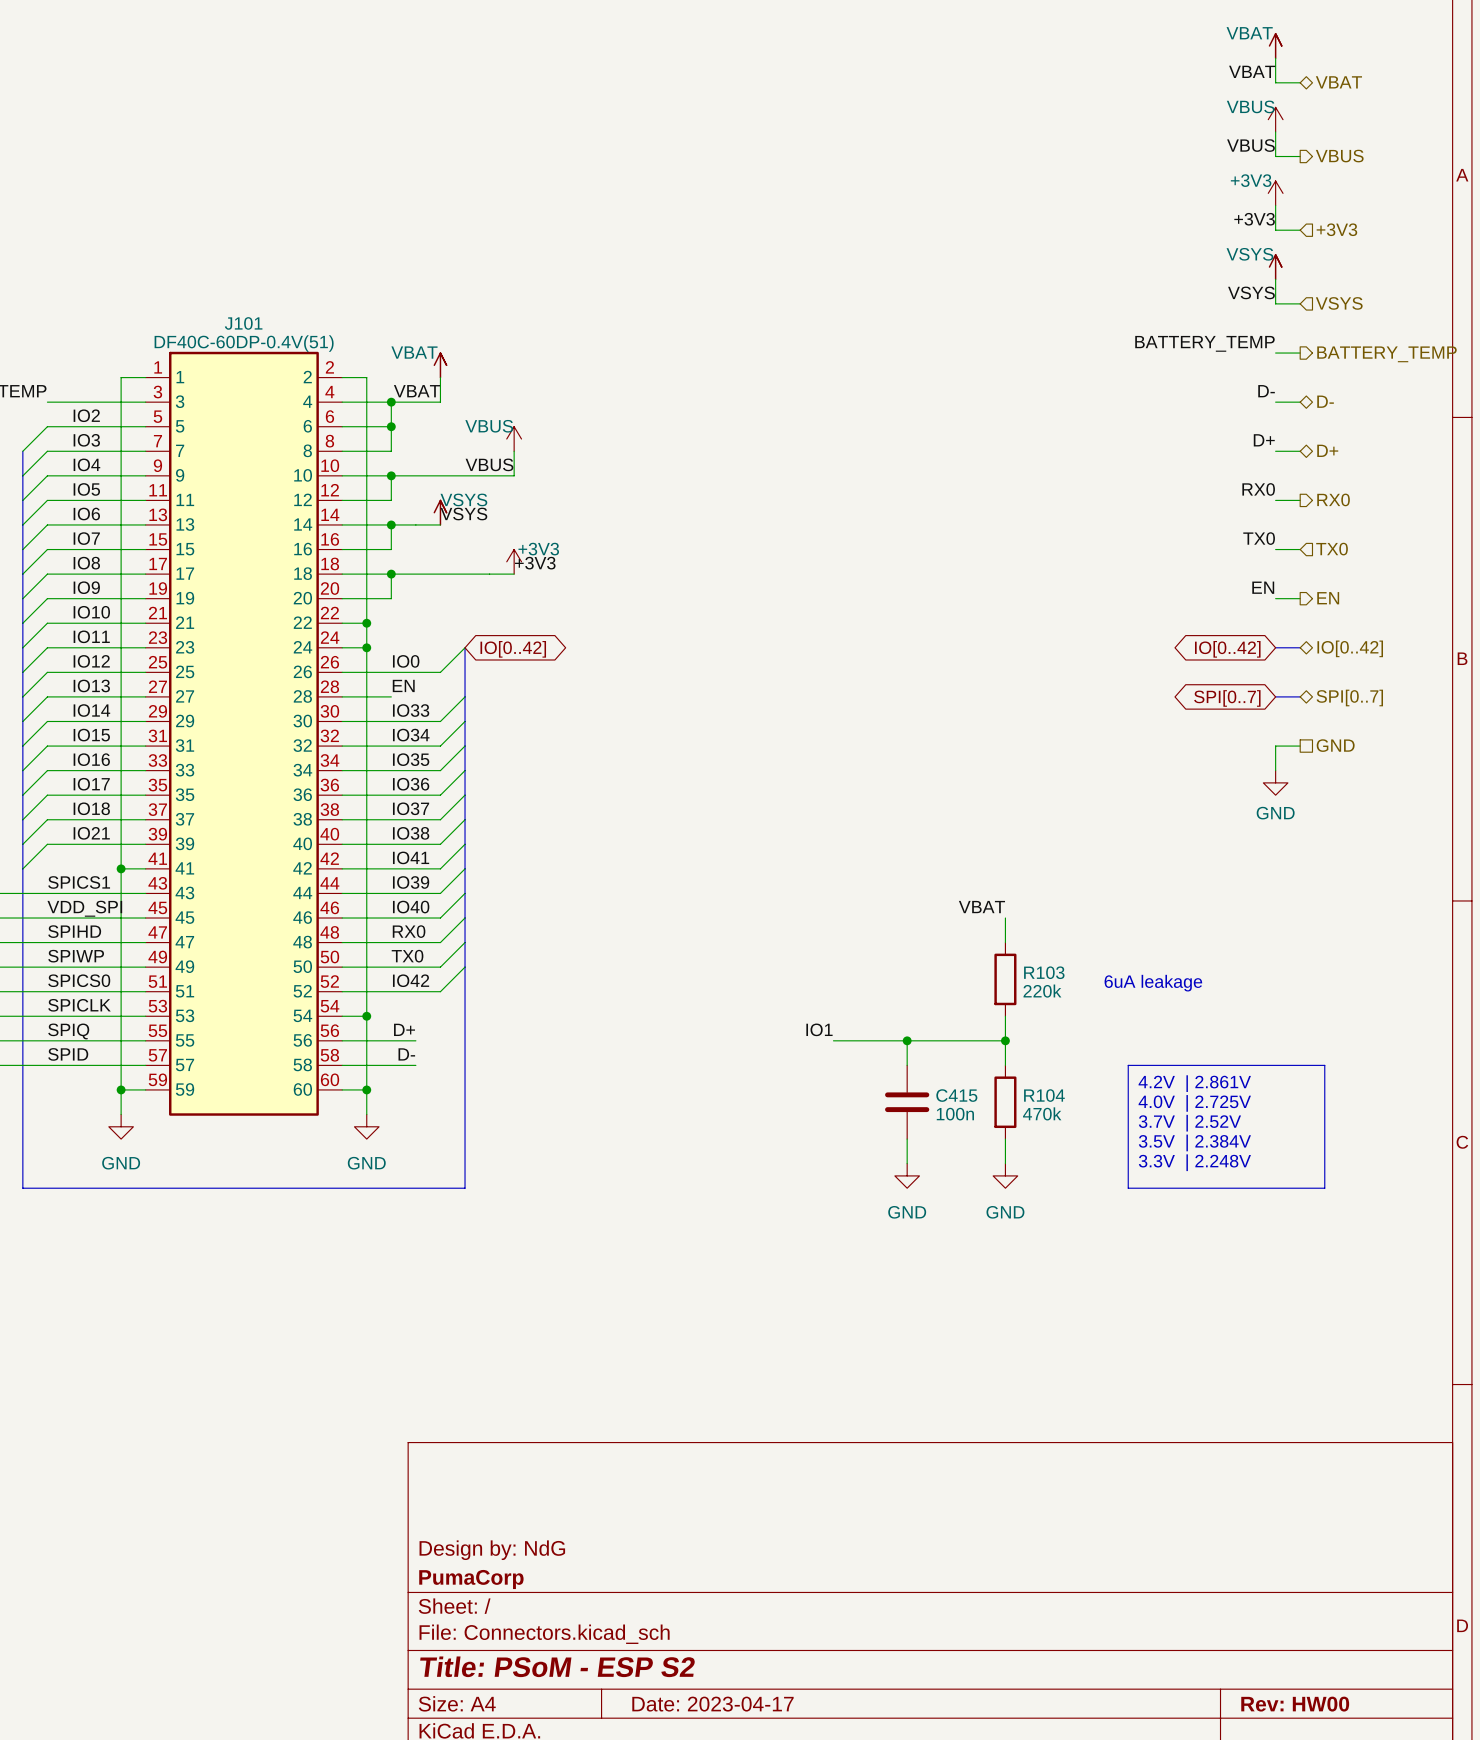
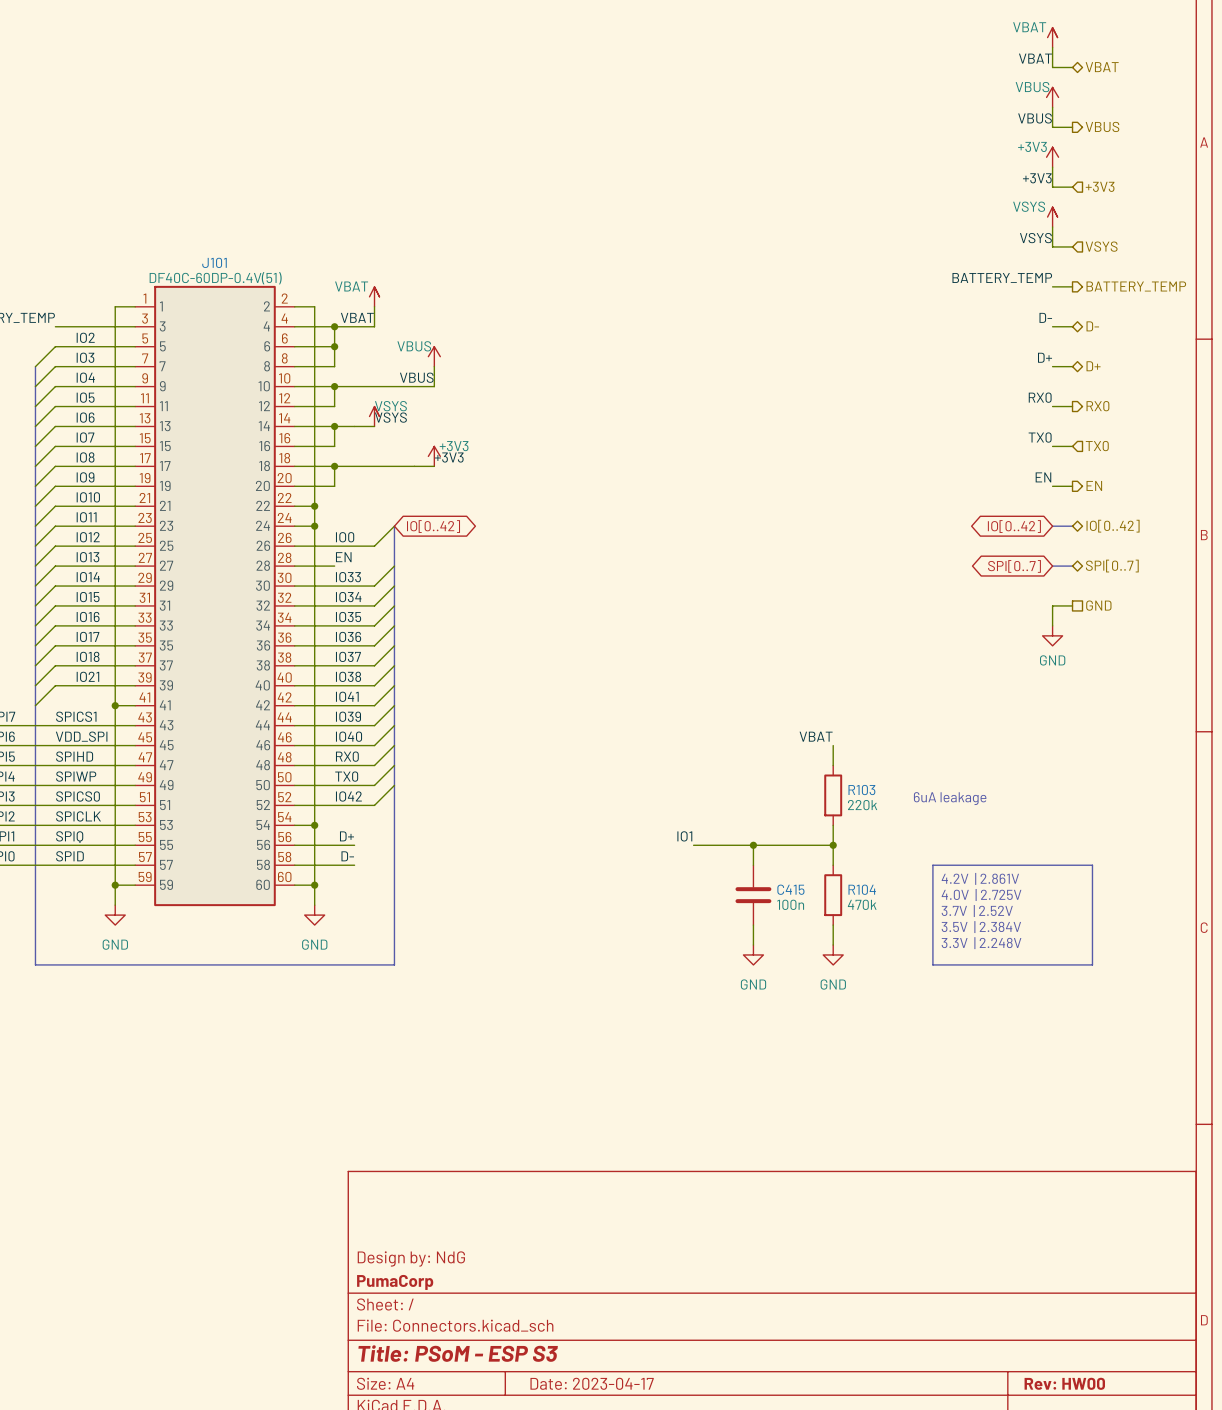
title block: Title: PSoM - ESP S2 (557, 1666) -> Title: PSoM - ESP S3 (458, 1353)

